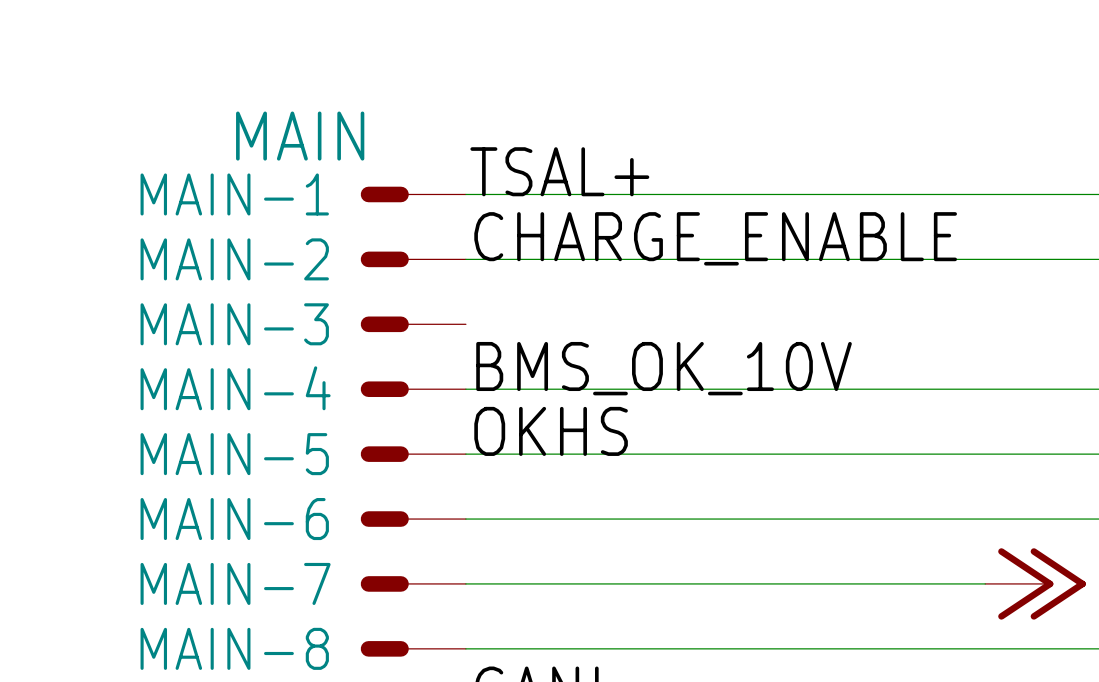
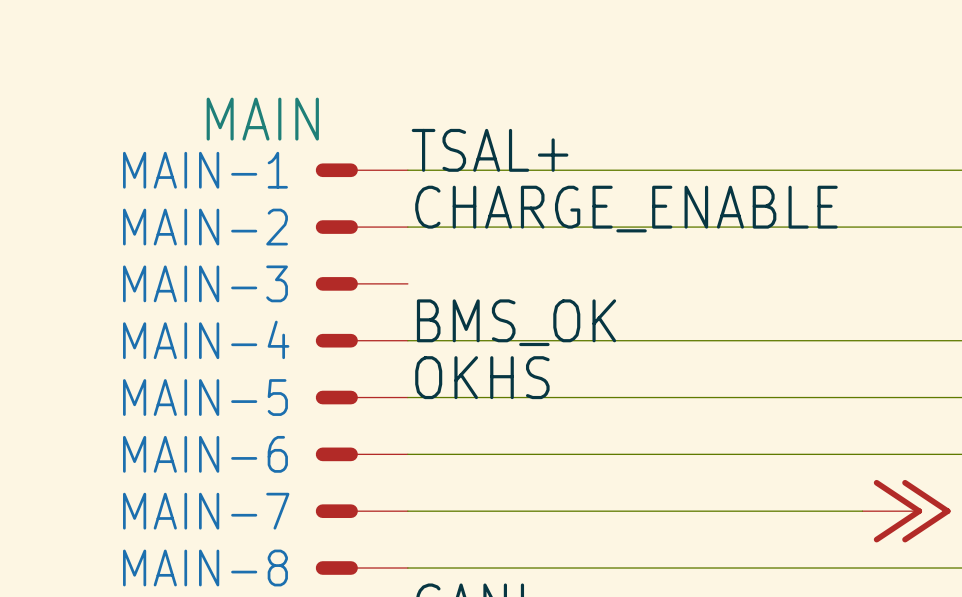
label: BMS_OK_10V (664, 368) -> BMS_OK (516, 322)

